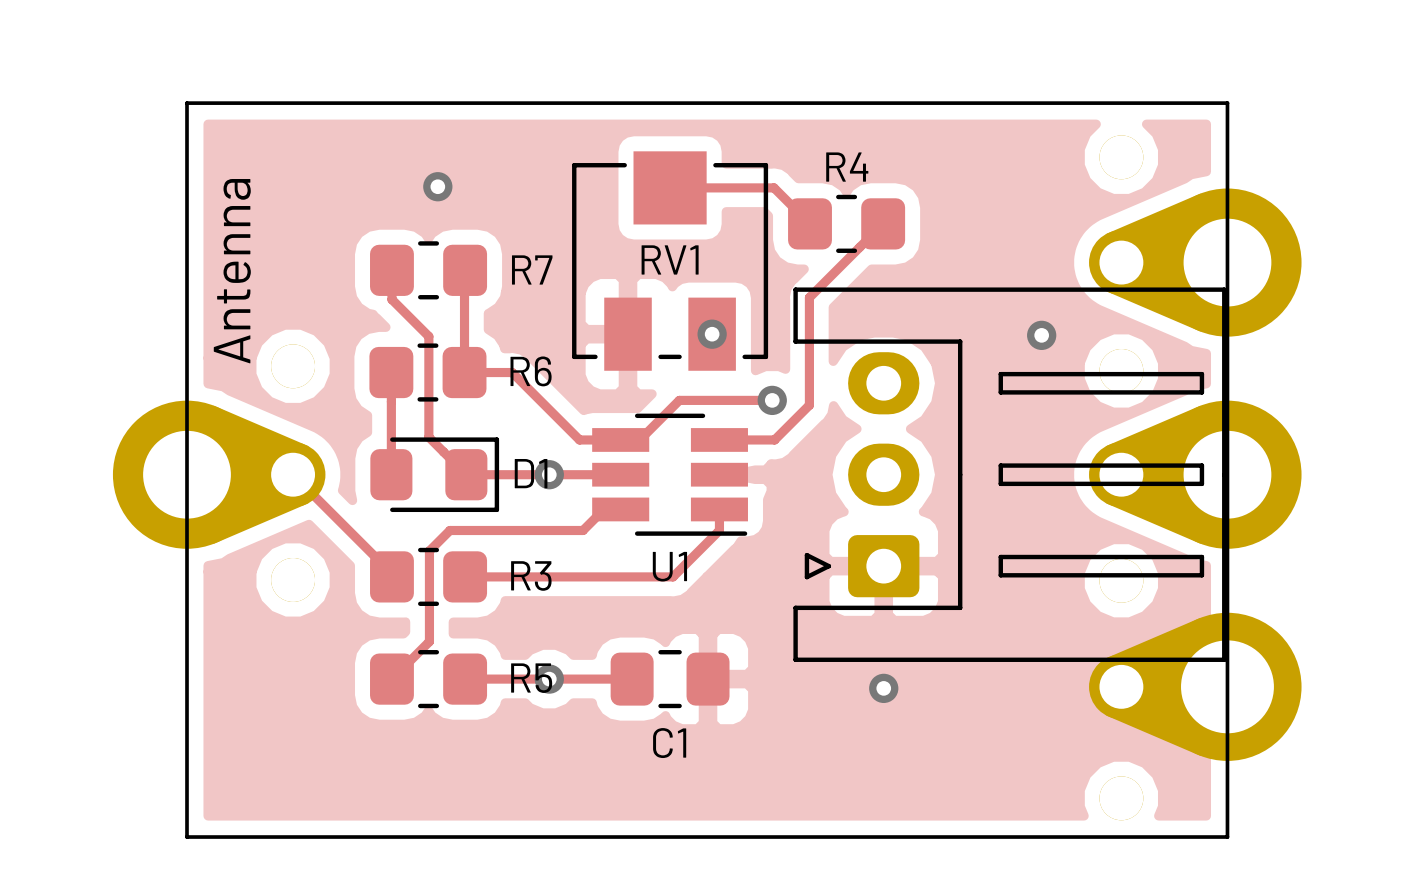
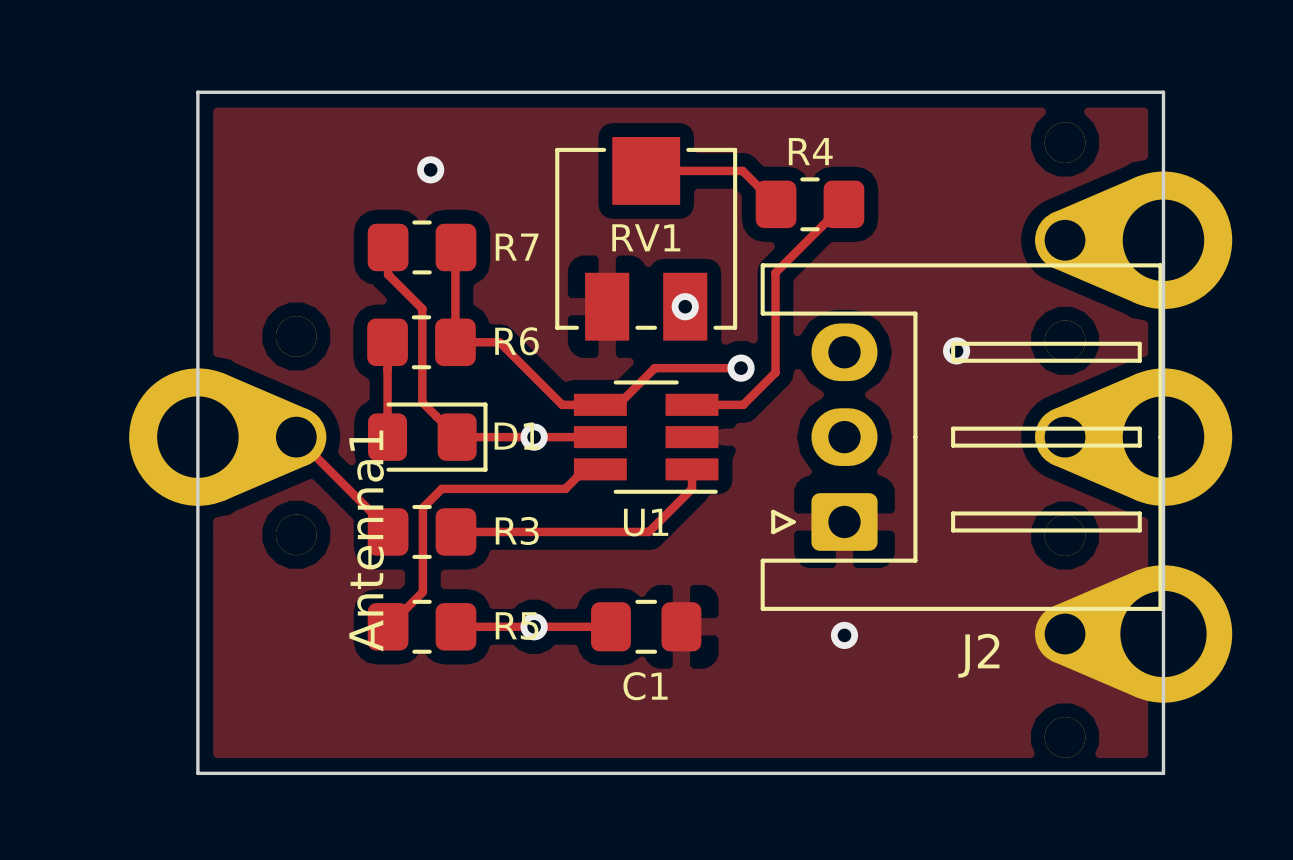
Antenna name: Antenna (232, 271) -> Antenna1 (366, 540)
via position: (1041, 335) -> (956, 350)
J2 name: none -> J2 (978, 655)

